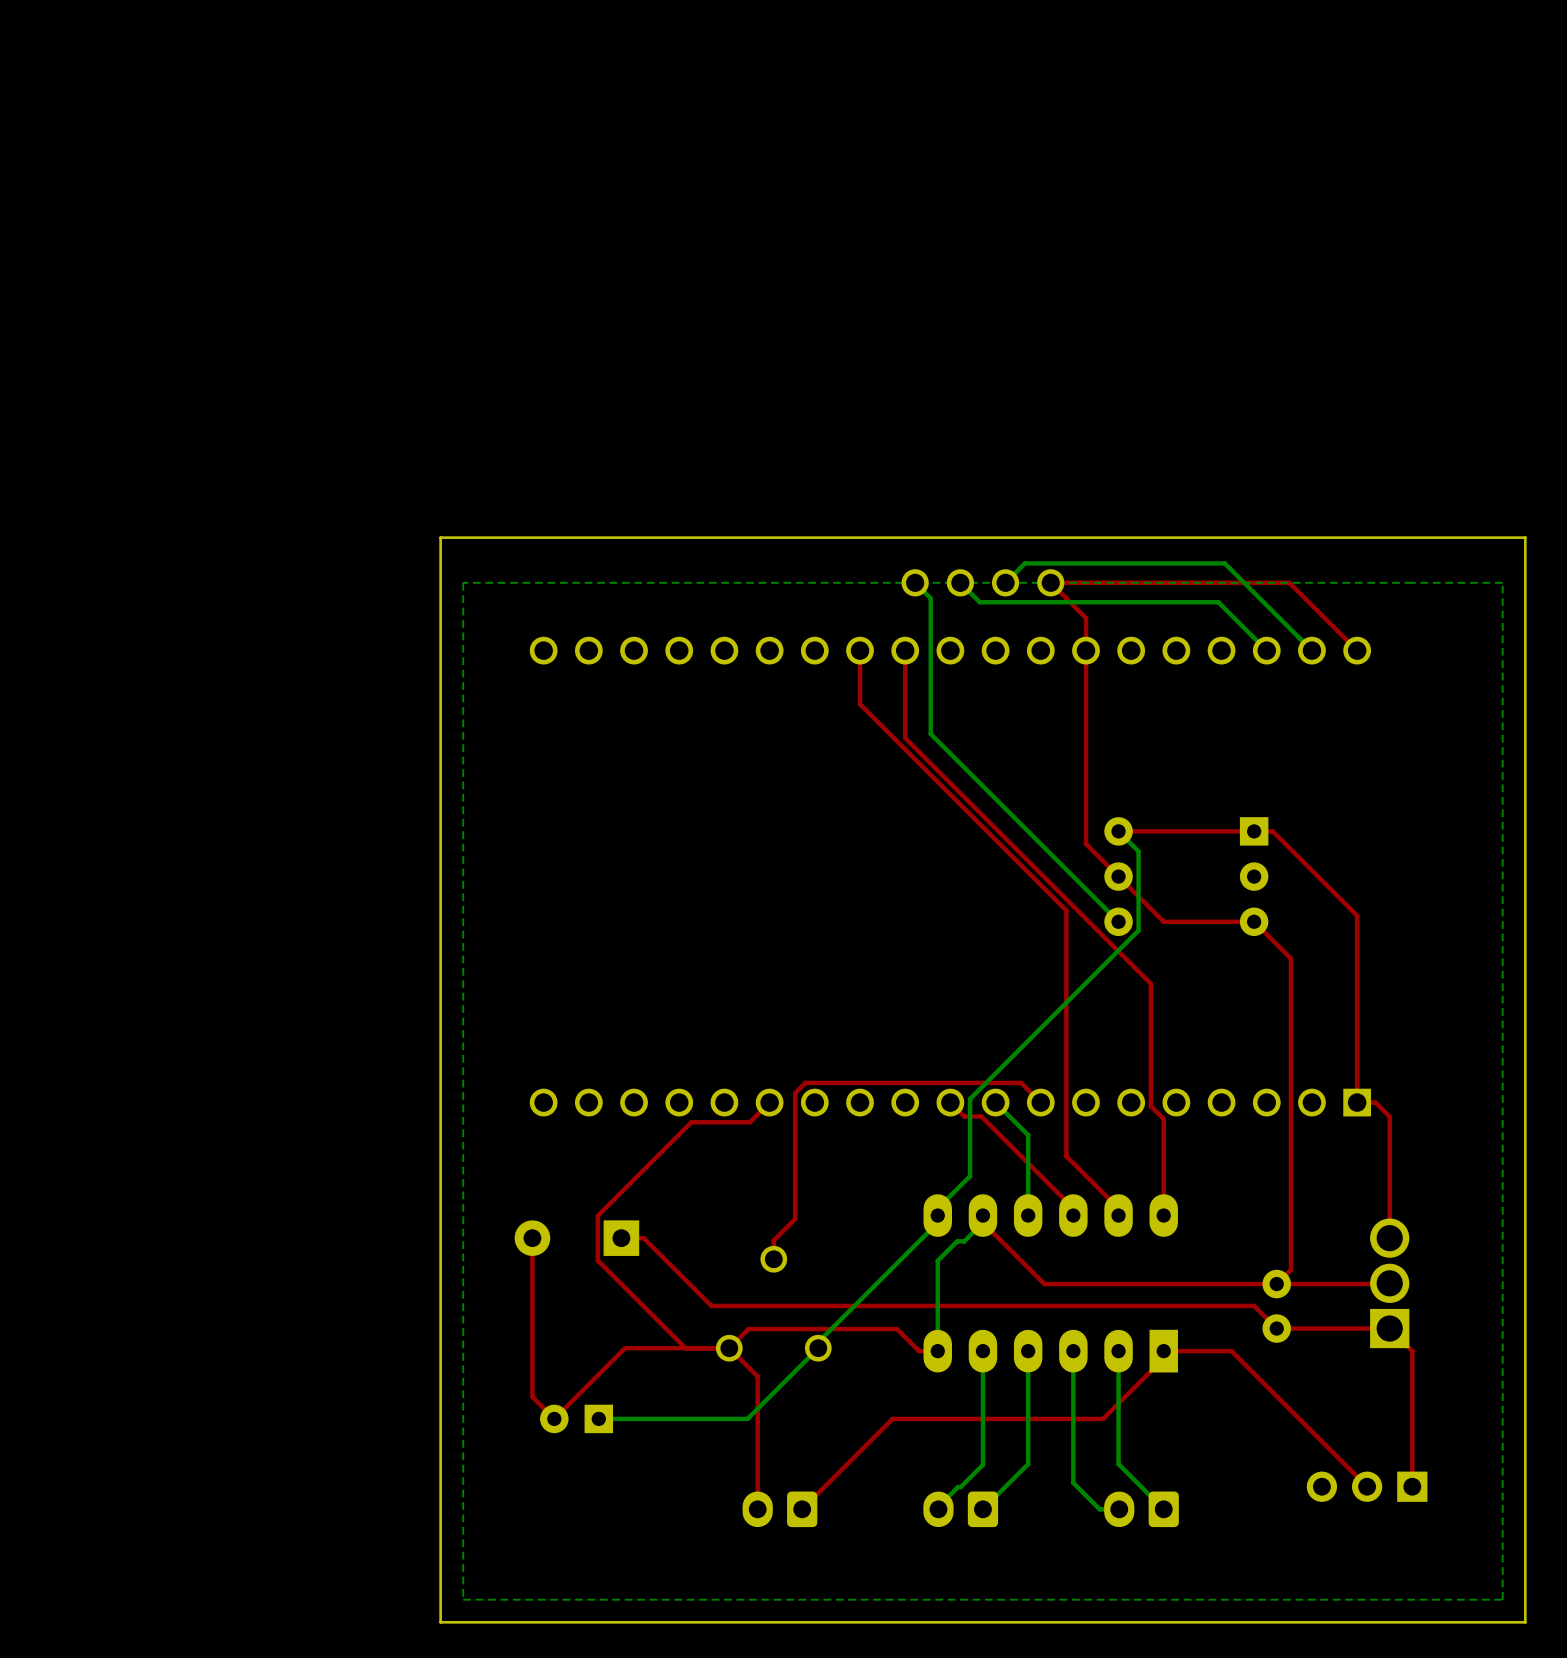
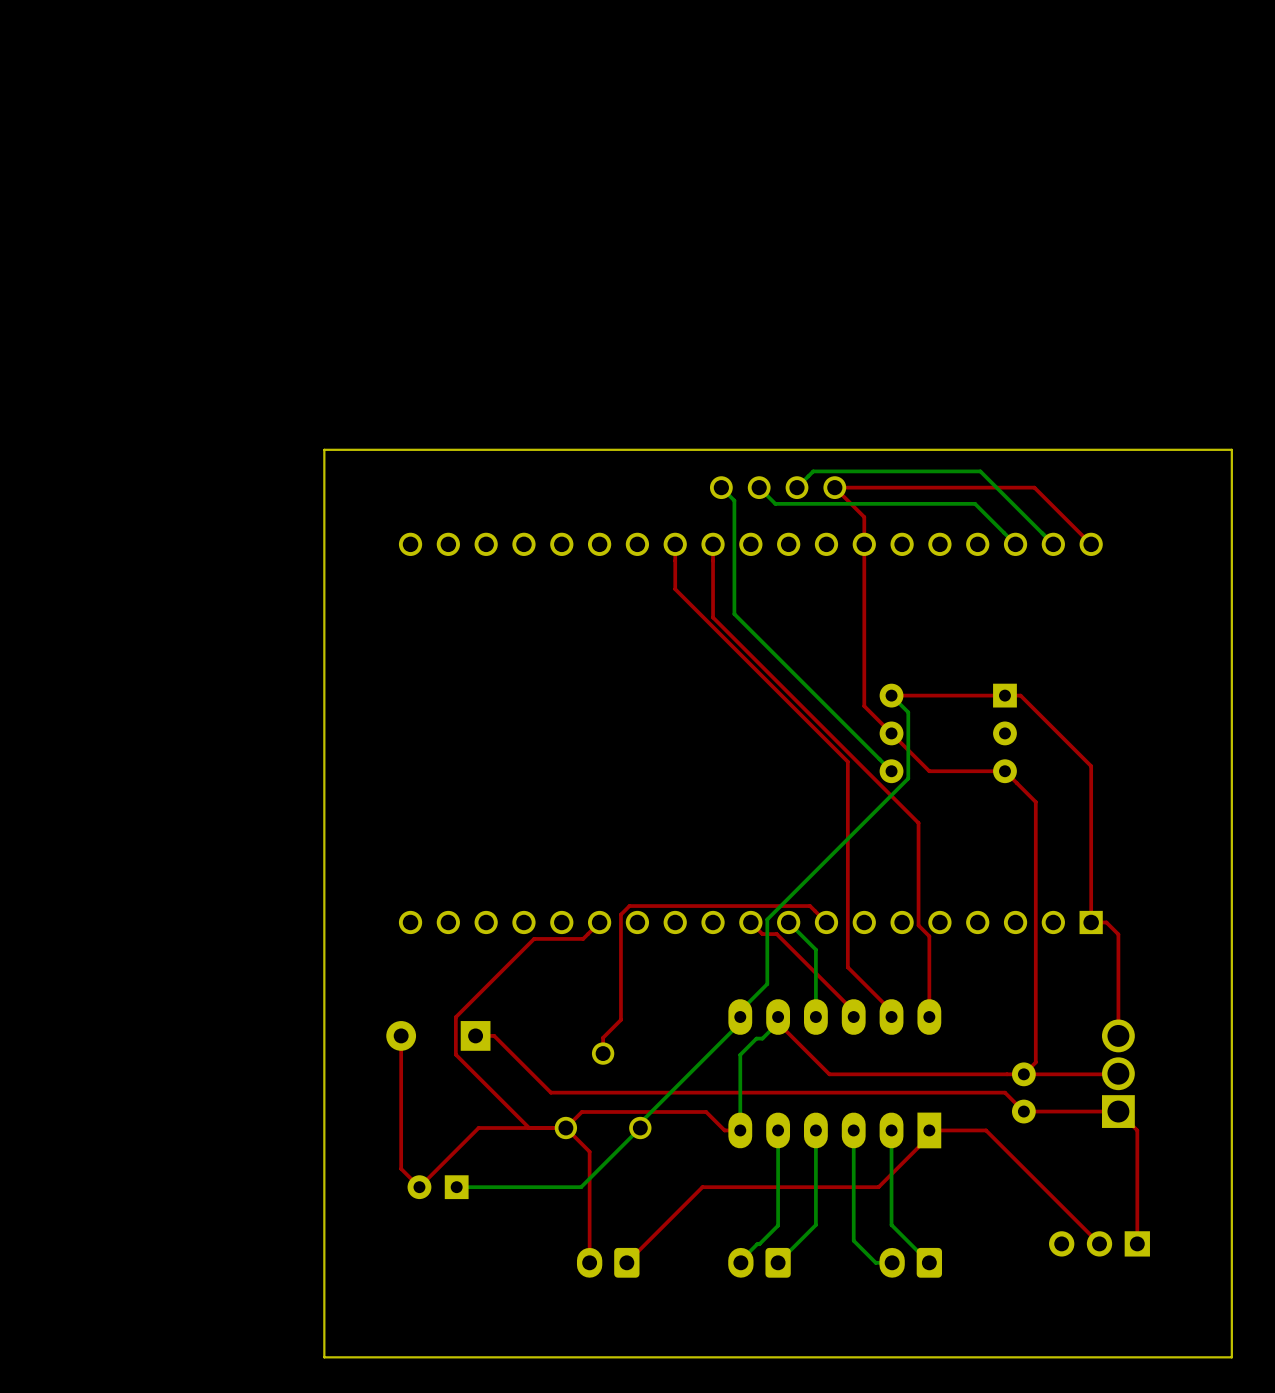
bottom zone outline: (1502, 582) (1502, 1599) (463, 1599) (463, 582) (1502, 582) -> none

